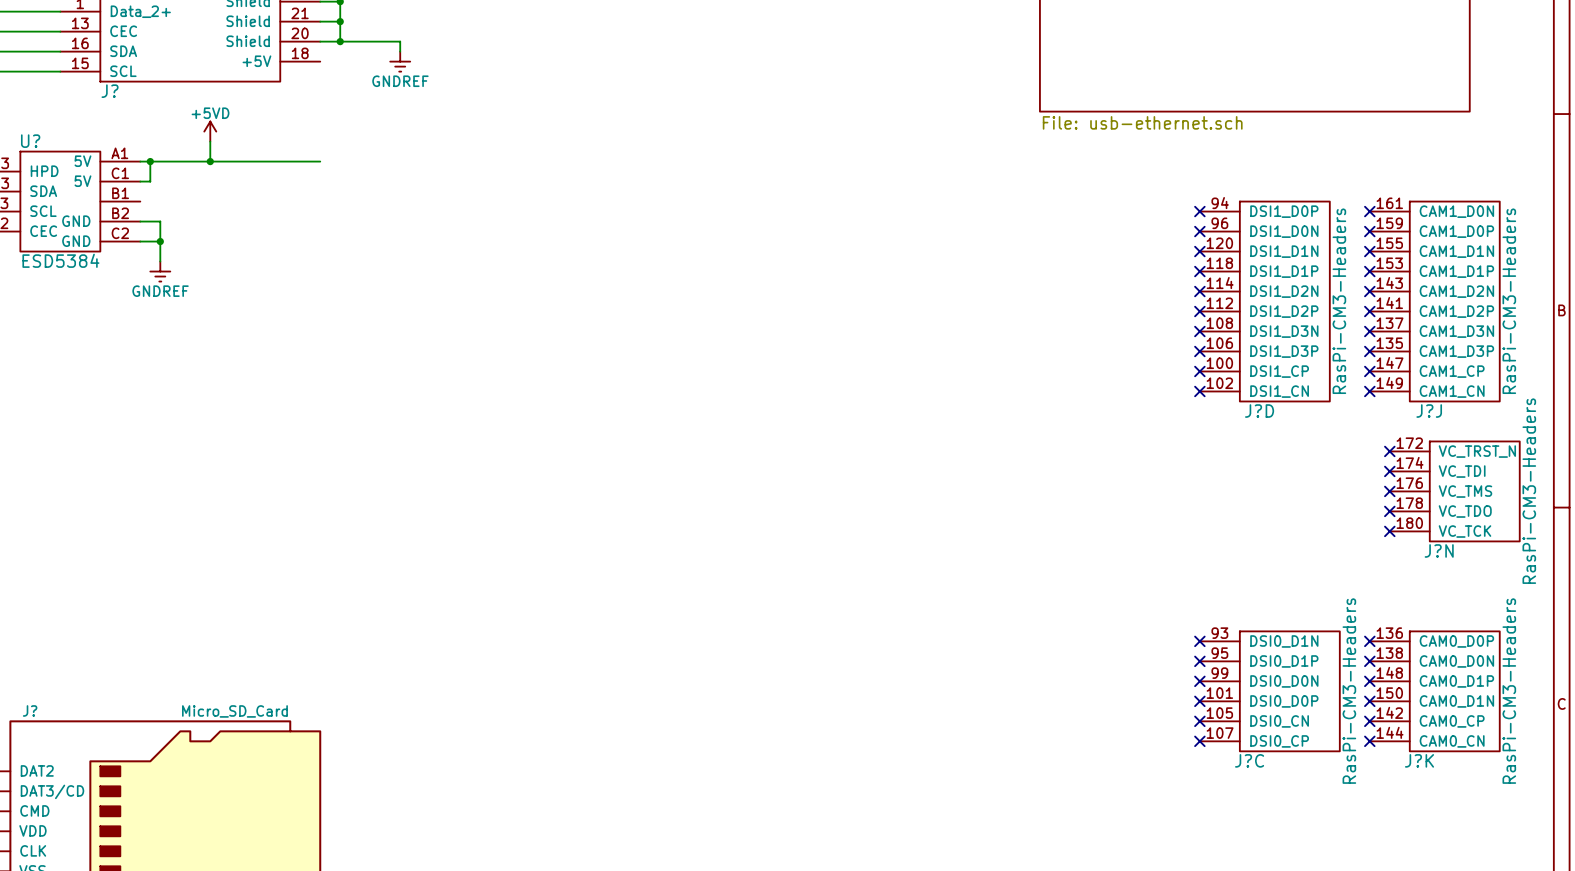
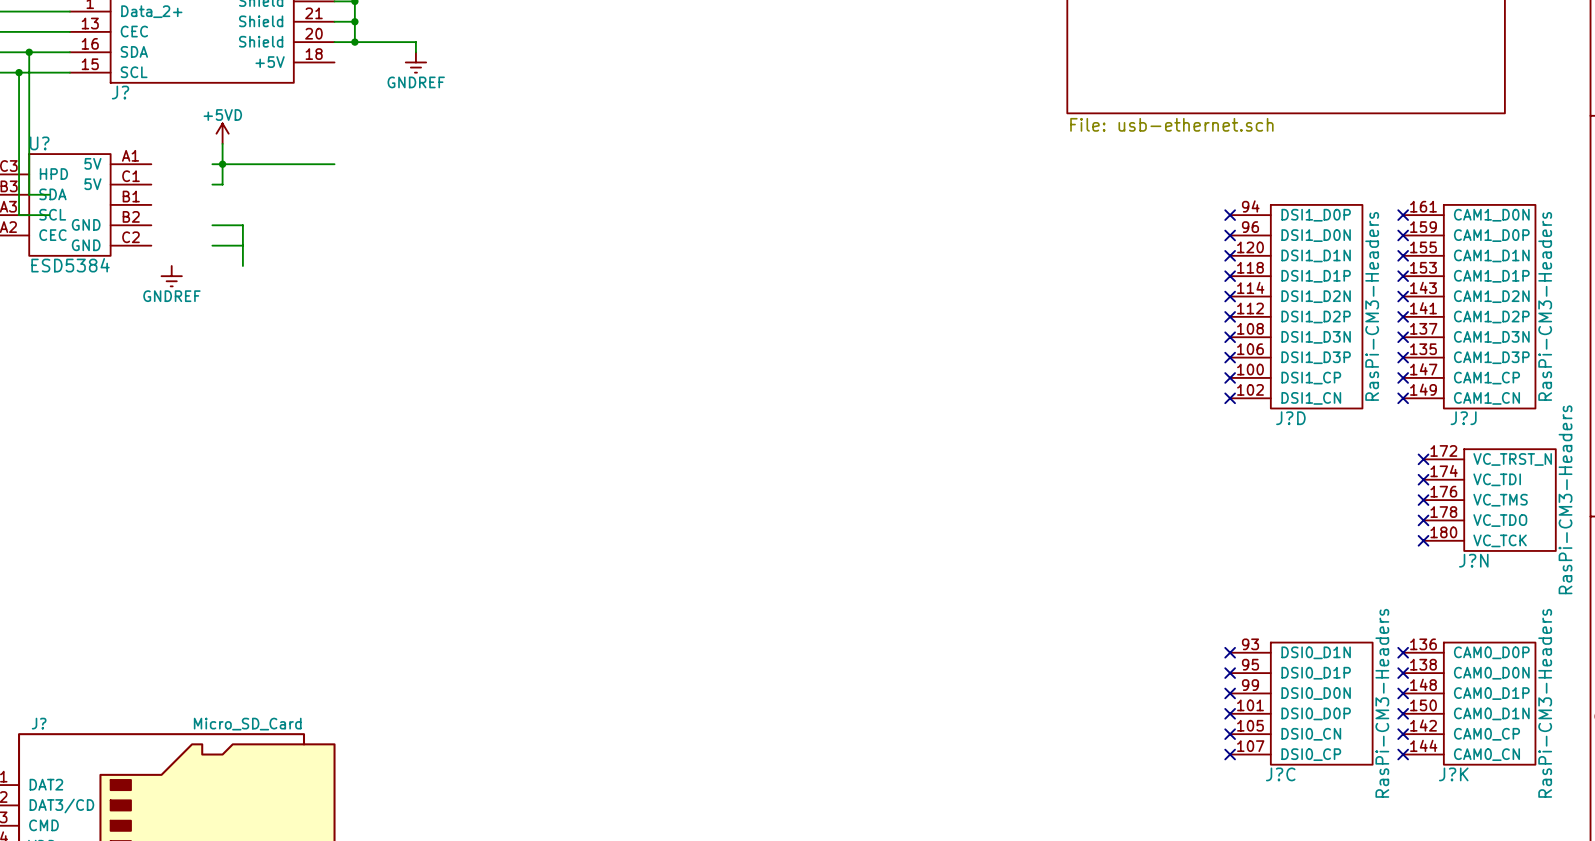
wire: none -> (29, 52) (29, 194) (49, 194)
junction: none -> (29, 52)
wire: none -> (19, 72) (19, 215) (49, 215)
junction: none -> (19, 72)
wire: (140, 161) (200, 161) -> none
wire: (150, 161) (150, 181) (140, 181) -> (222, 164) (222, 184) (212, 184)
junction: (150, 161) -> none
wire: (140, 221) (160, 221) (160, 261) -> none
wire: none -> (212, 225) (242, 225) (242, 266)
wire: (140, 241) (160, 241) -> none
junction: (160, 241) -> none
wire: none -> (212, 245) (242, 245)

